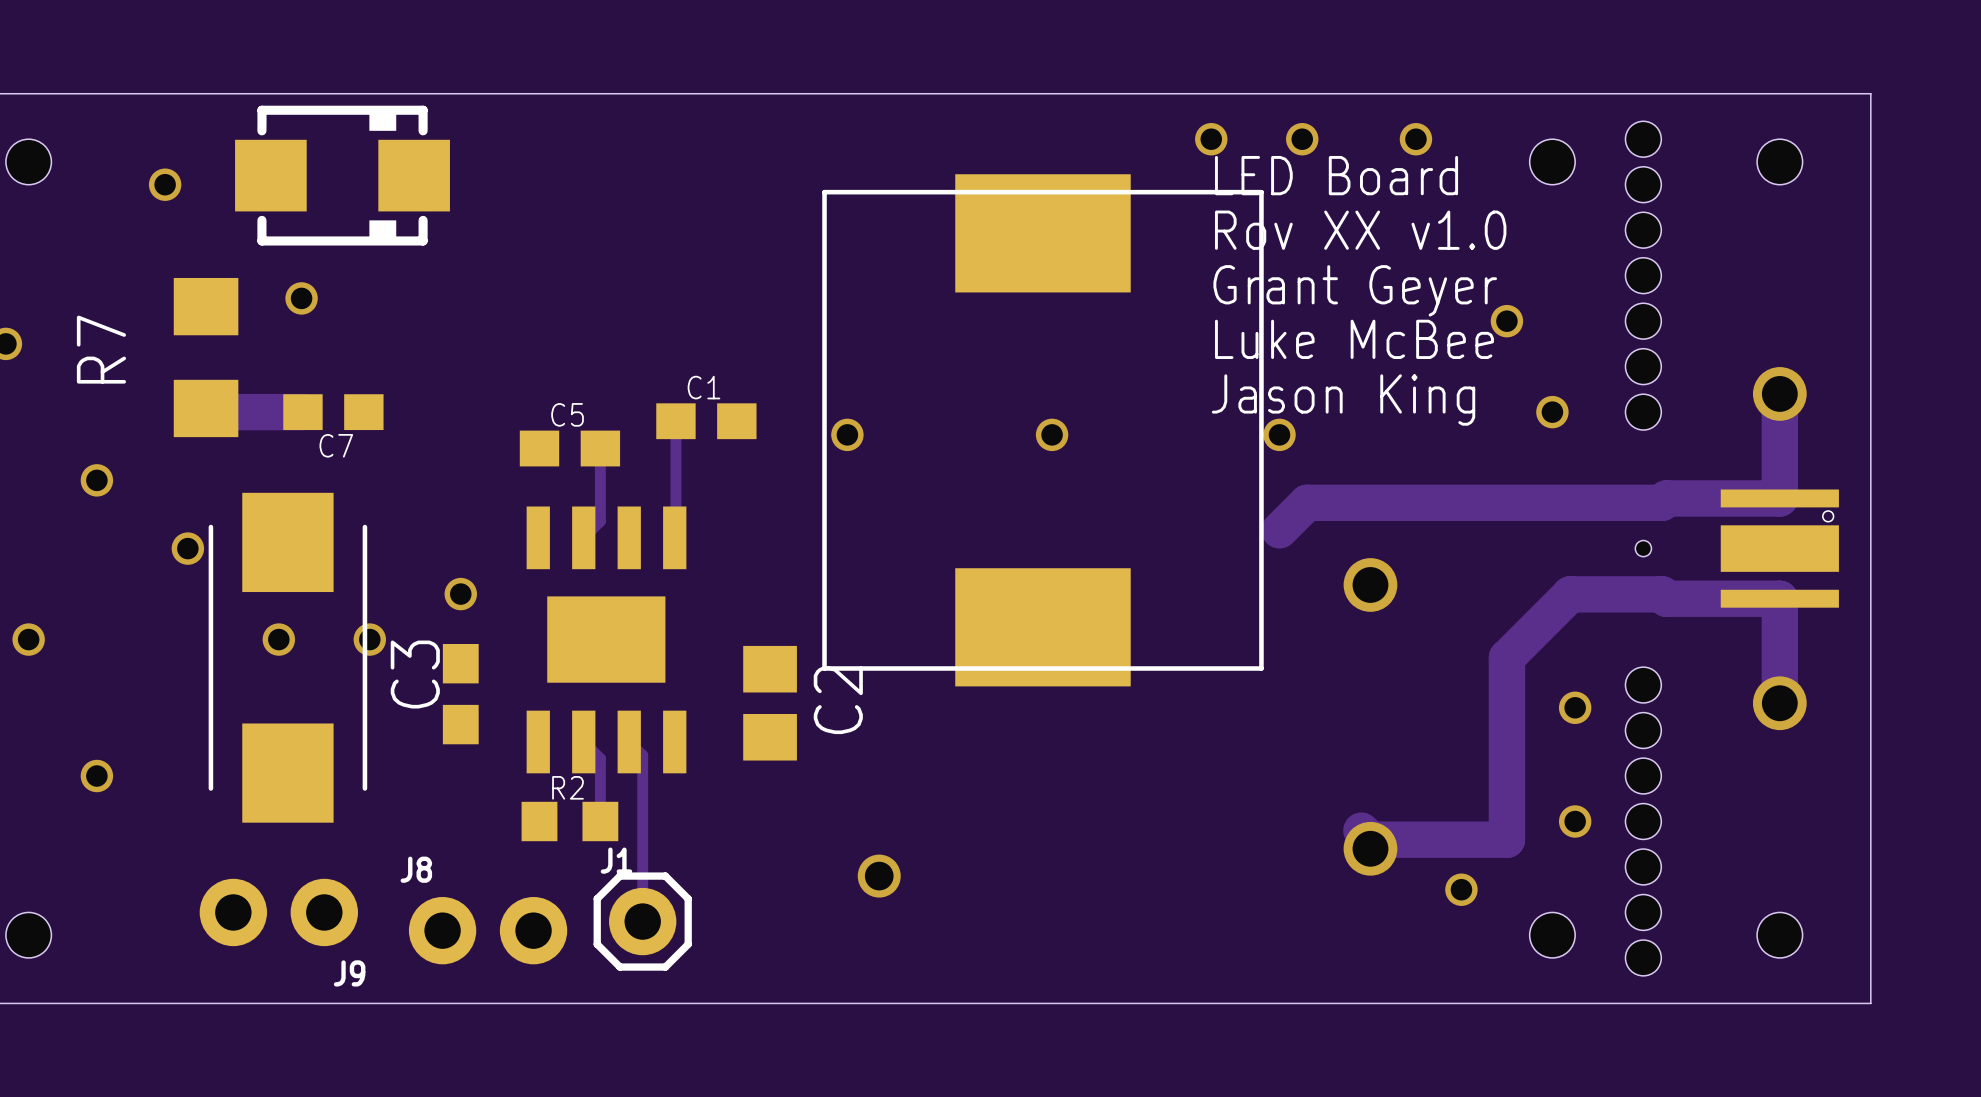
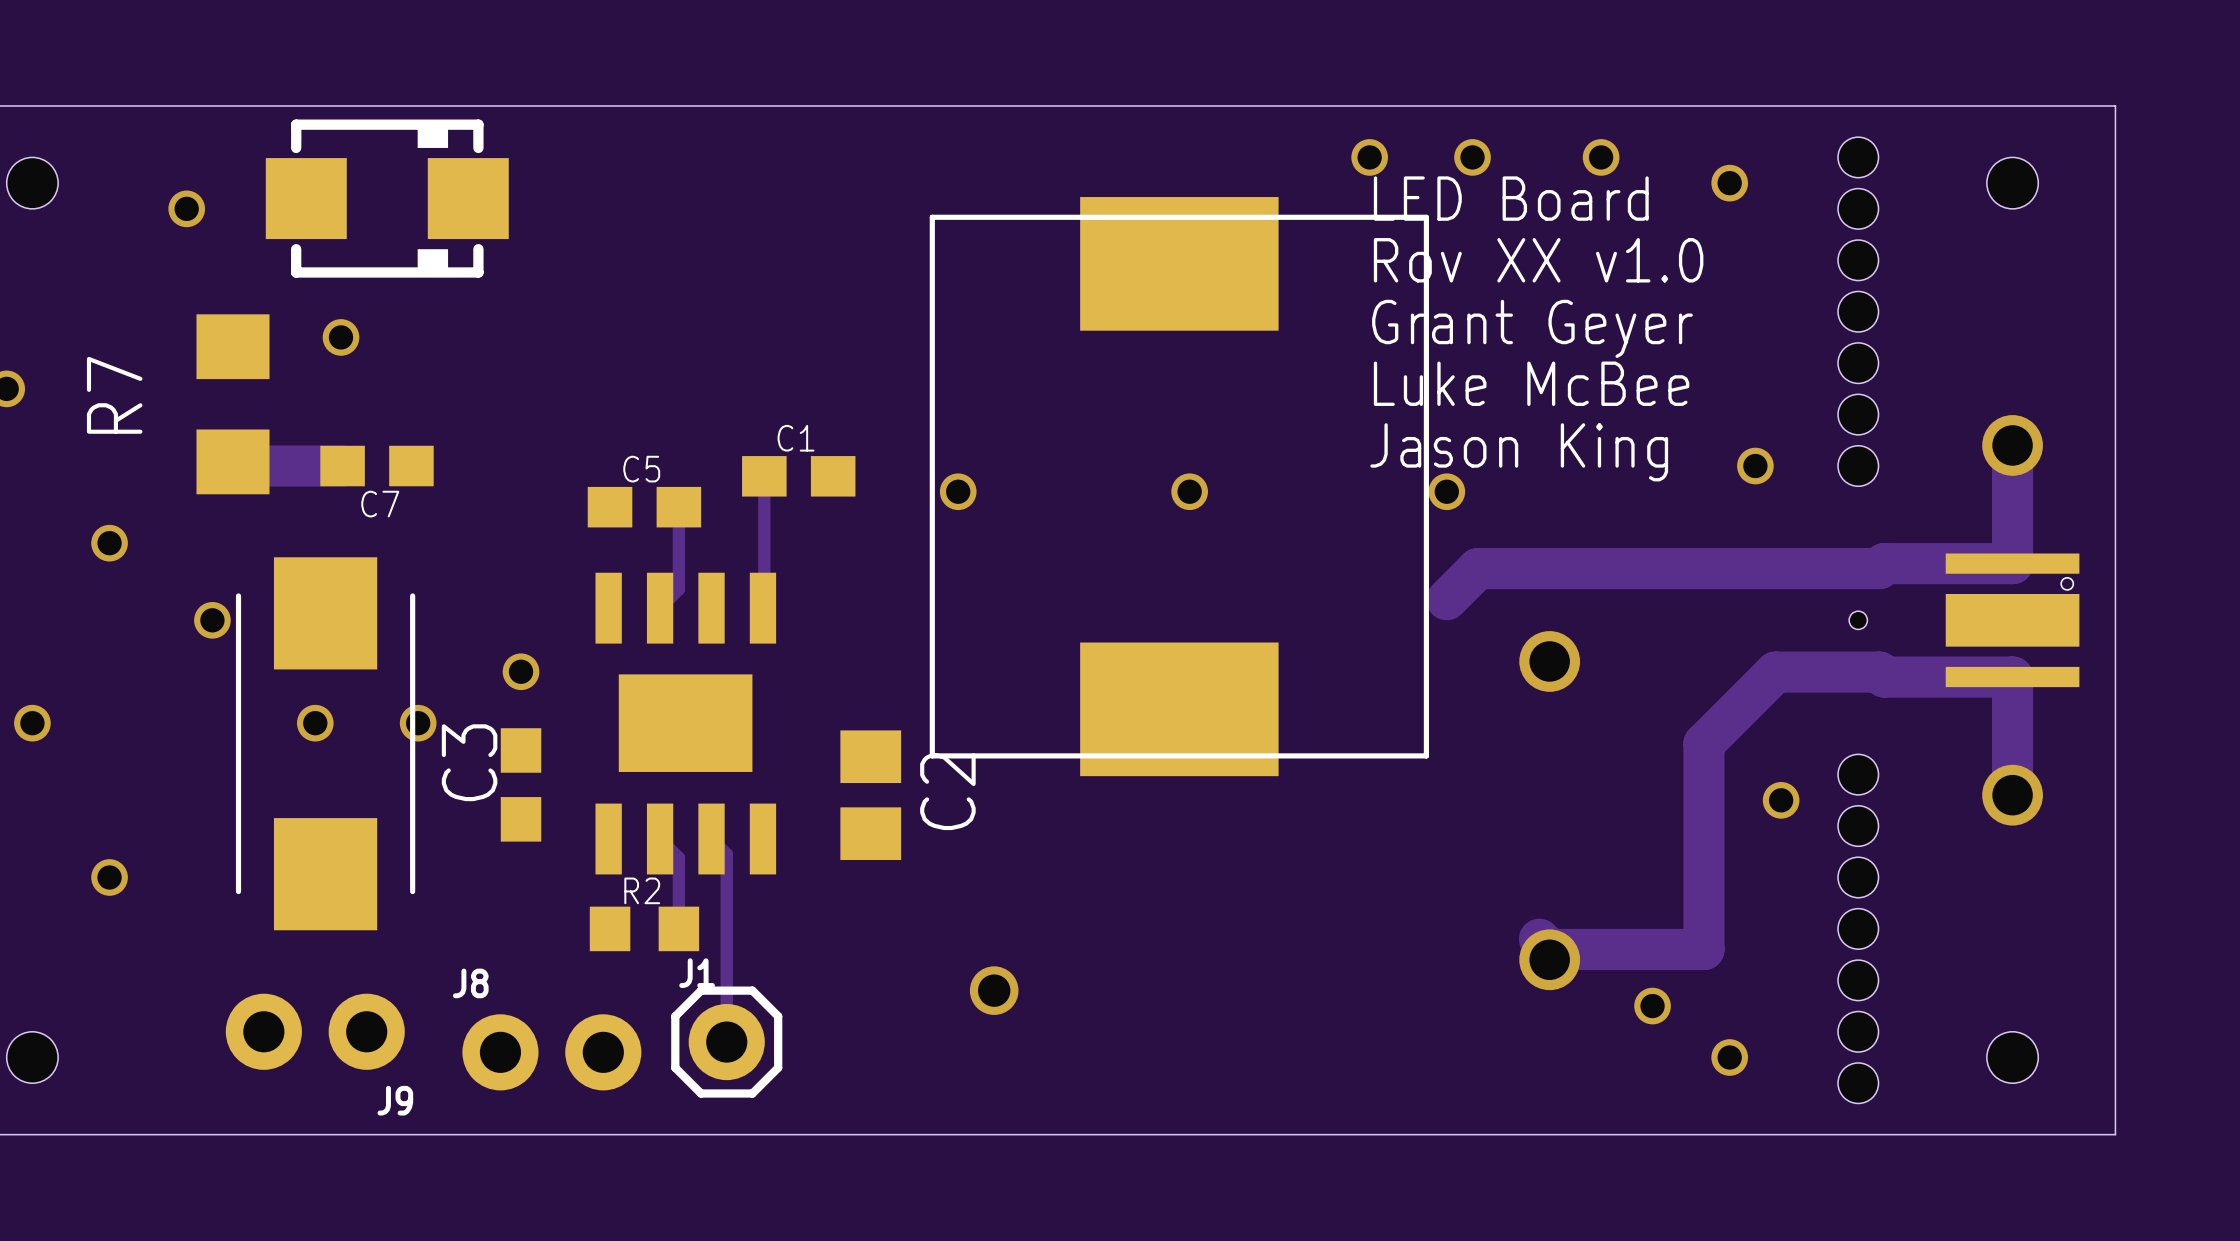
hole: (1552, 161) -> none
via position: (1506, 321) -> (1729, 183)
via position: (1575, 821) -> (1729, 1057)
hole: (1552, 935) -> none

